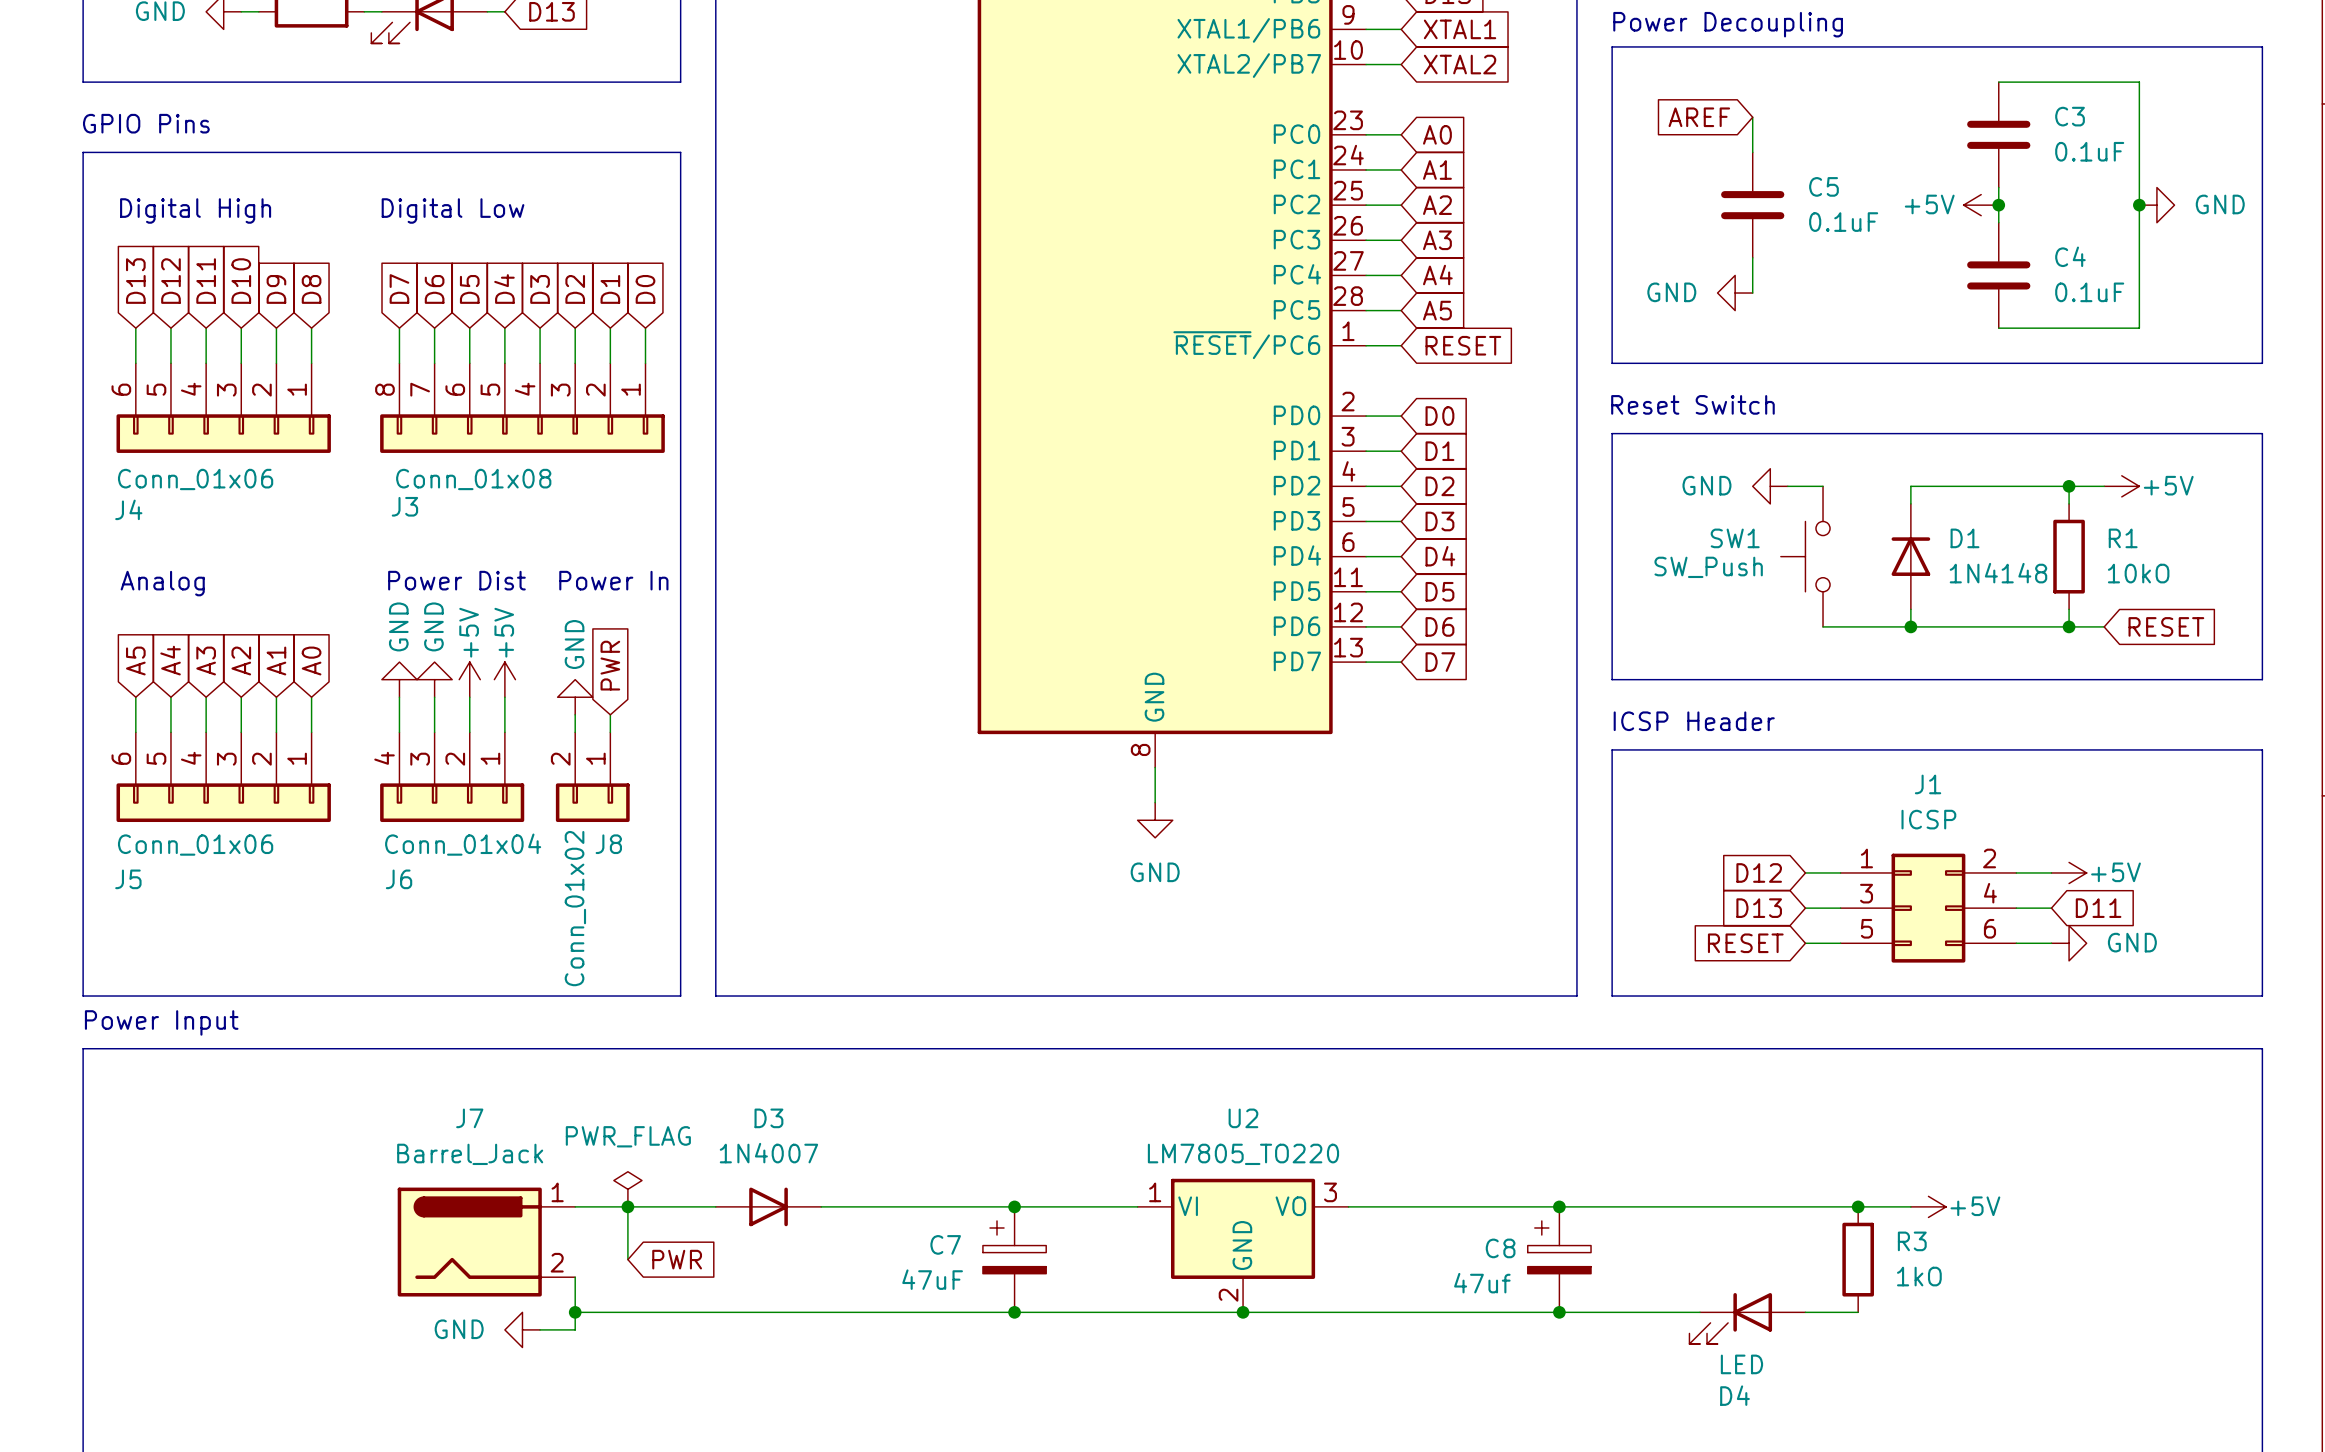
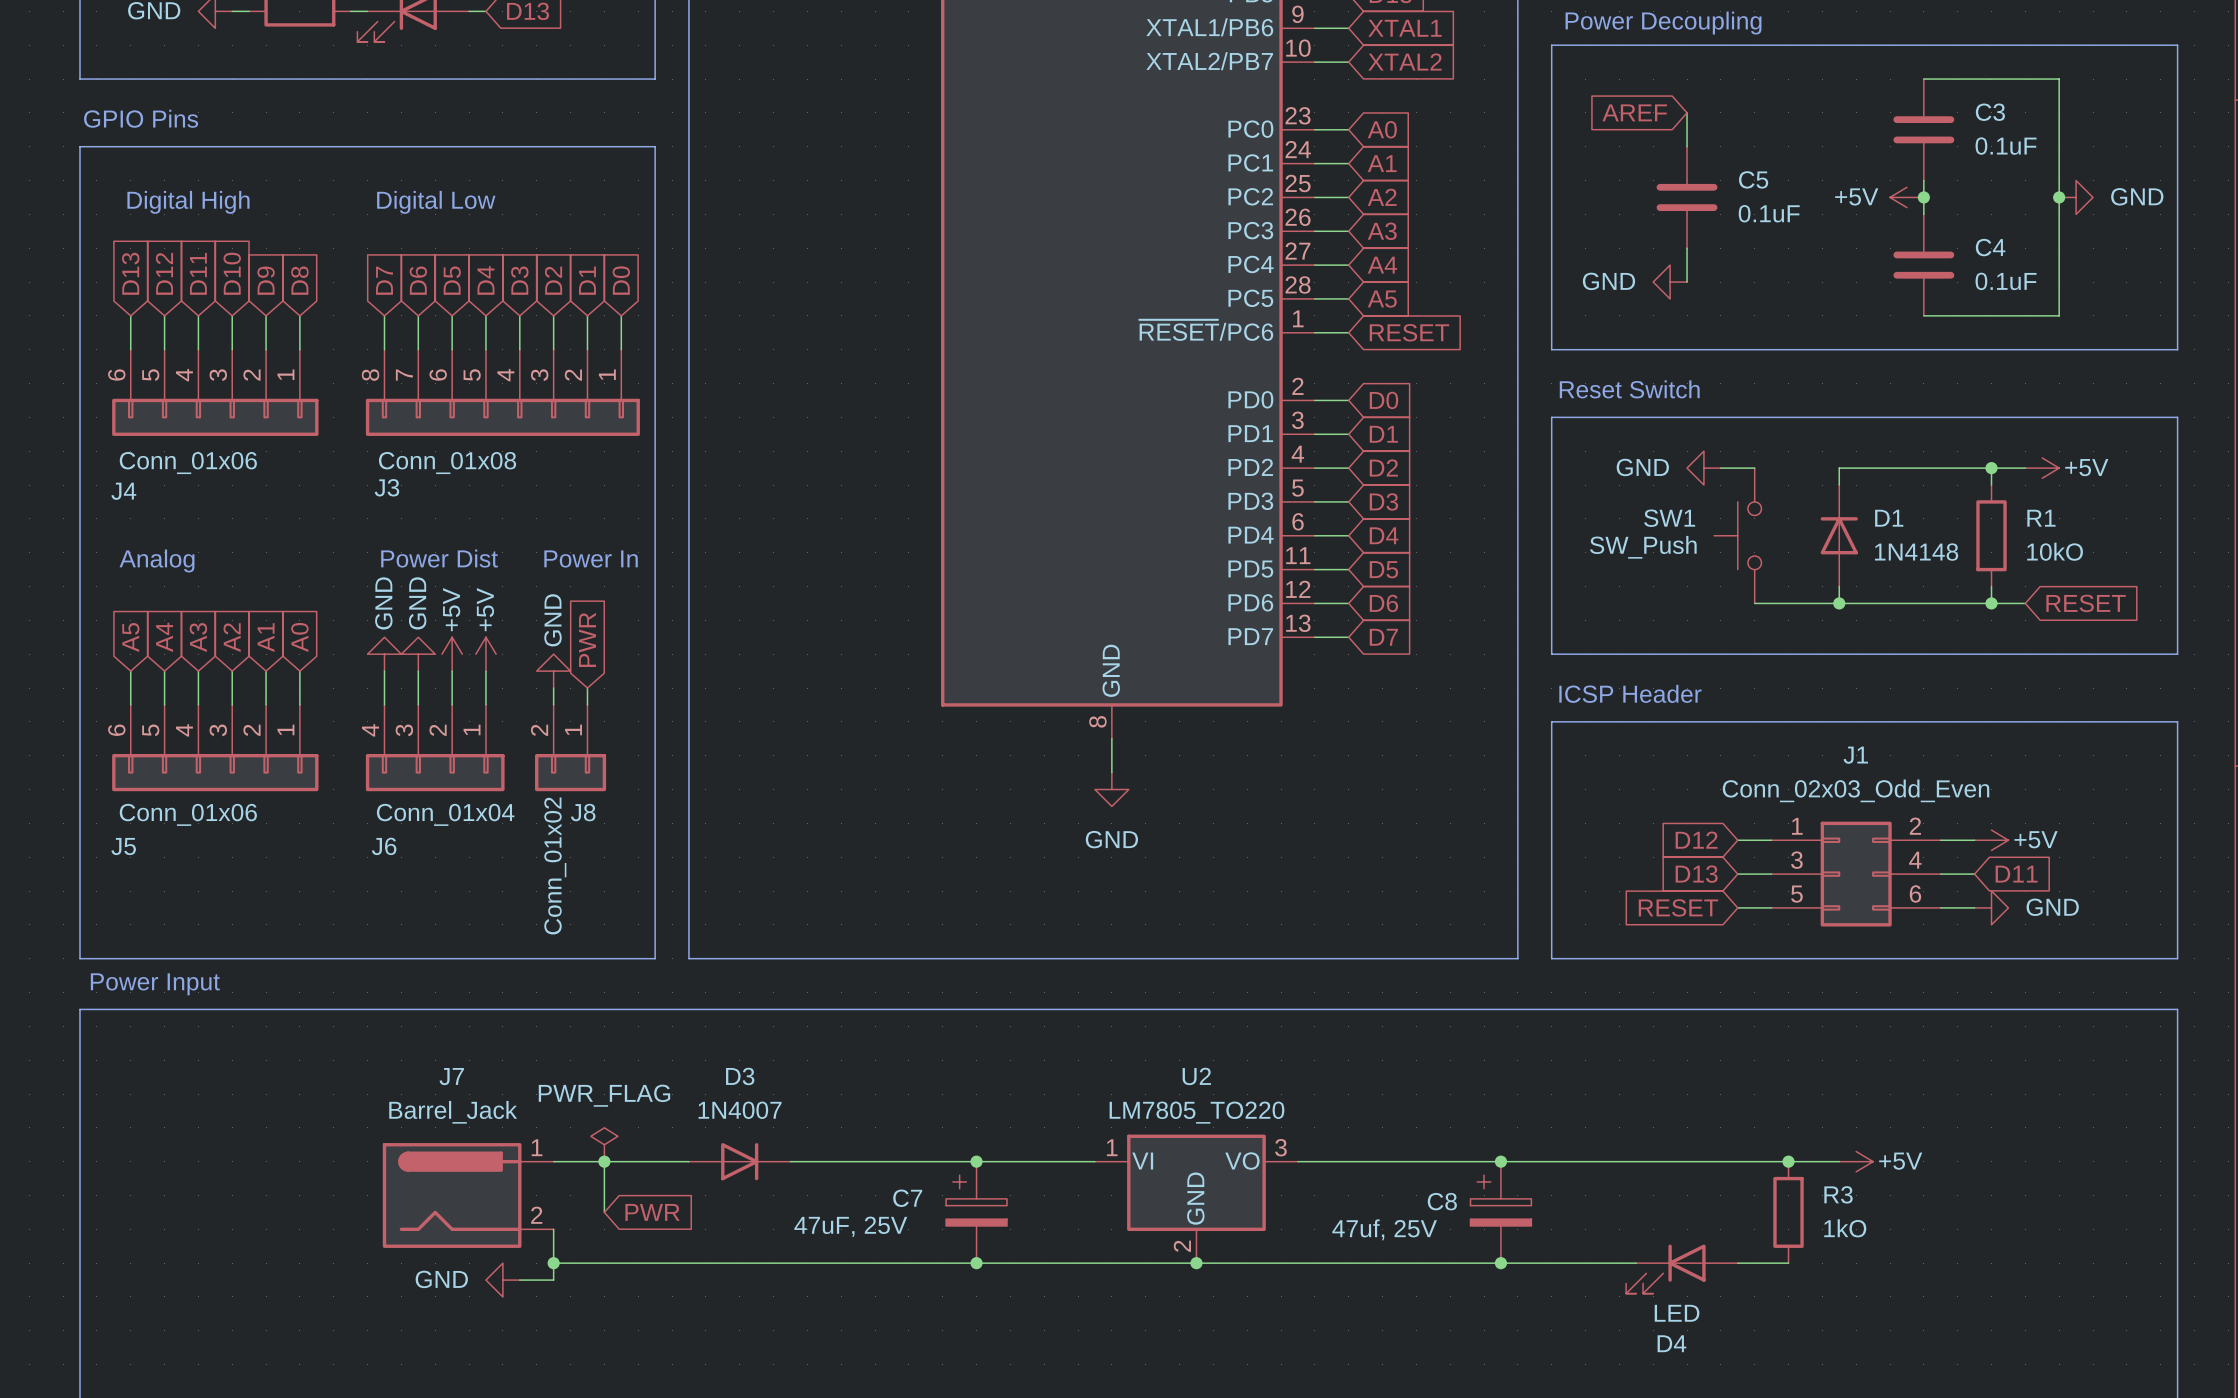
J1 value: ICSP (1928, 819) -> Conn_02x03_Odd_Even (1856, 790)
C7 value: 47uF (932, 1279) -> 47uF, 25V (850, 1226)
C8 value: 47uf (1482, 1283) -> 47uf, 25V (1384, 1229)

